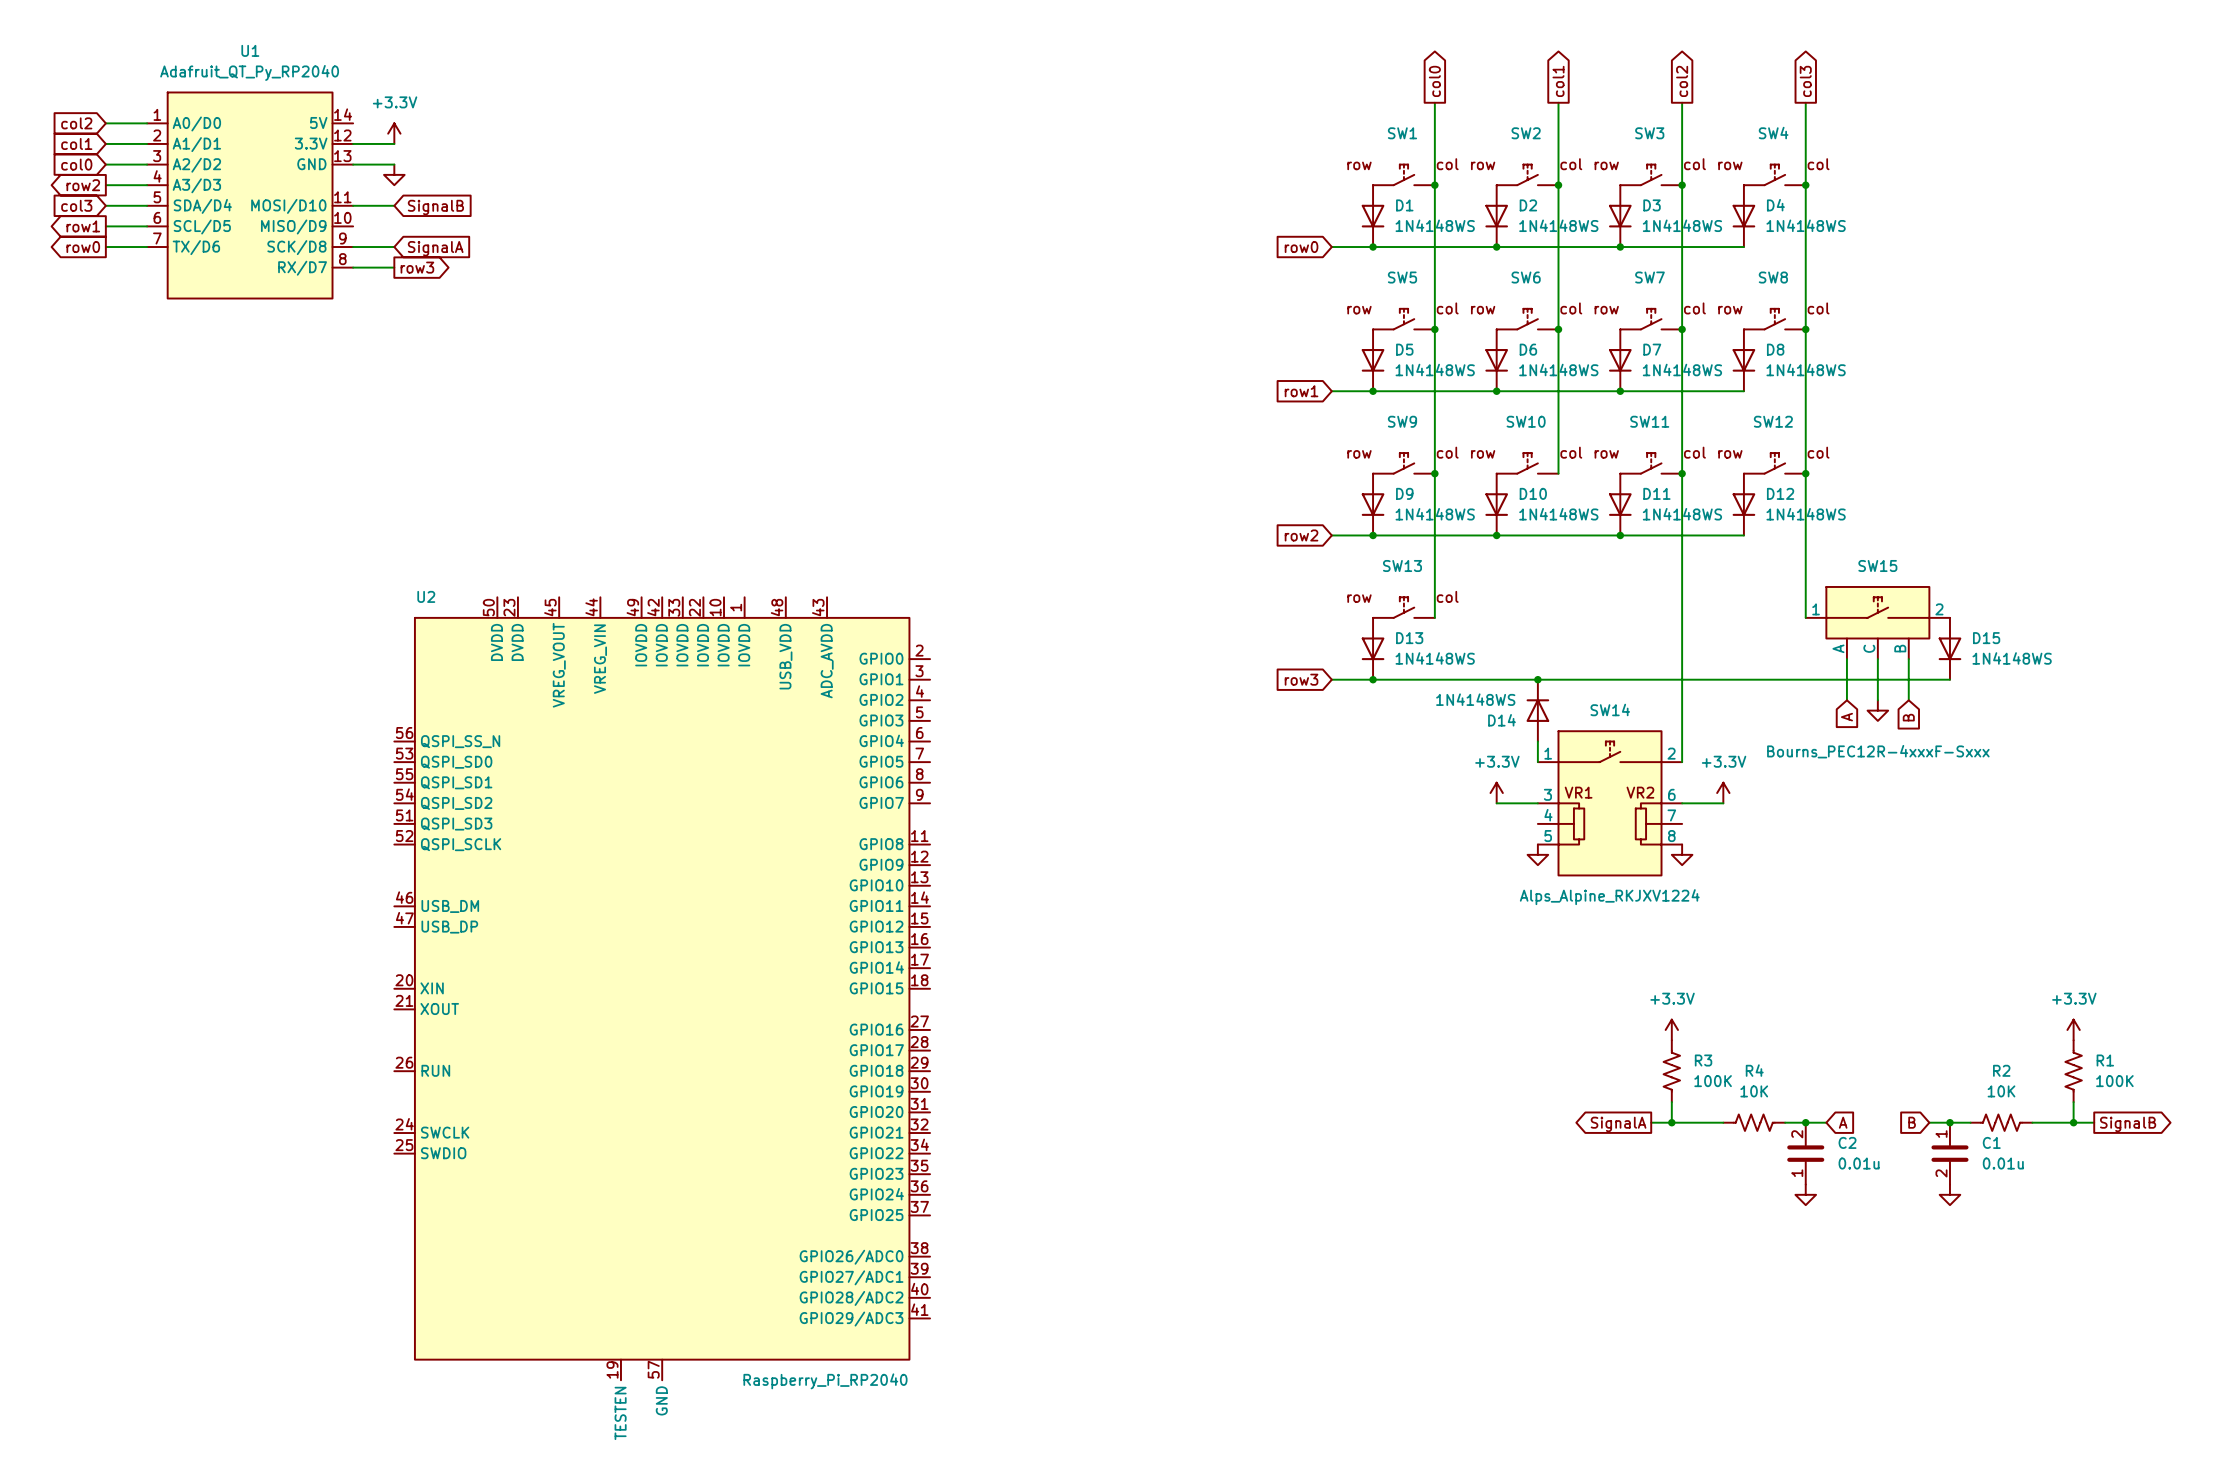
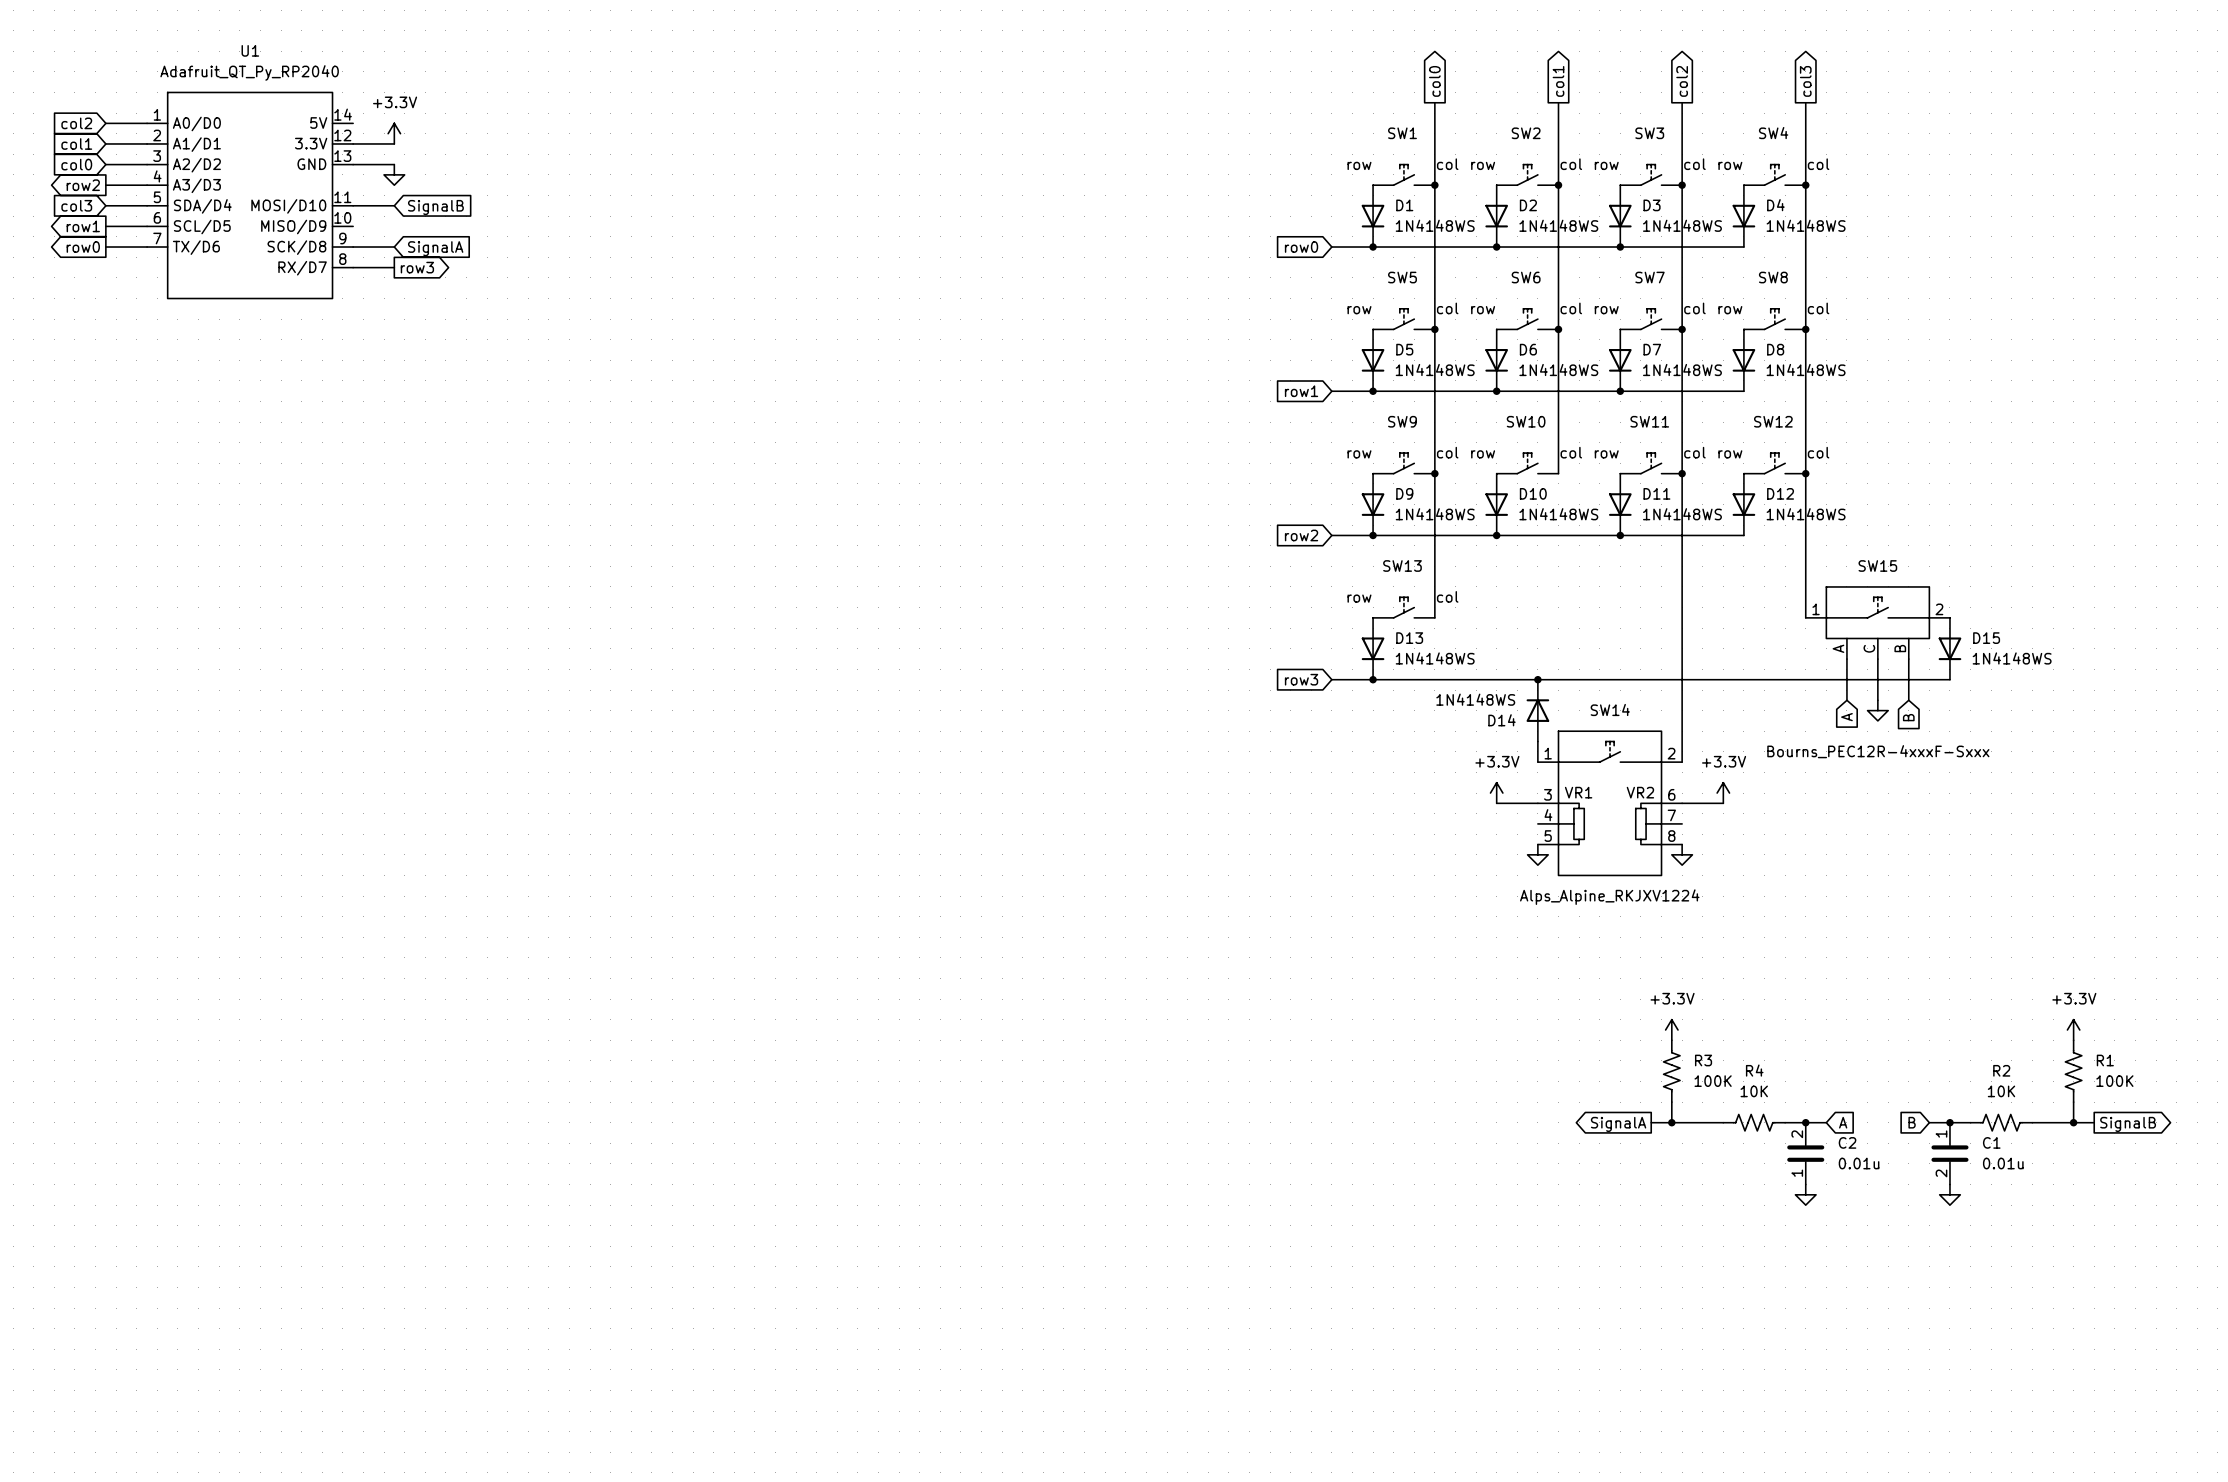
U2: Raspberry_Pi_RP2040 (662, 988) -> none

